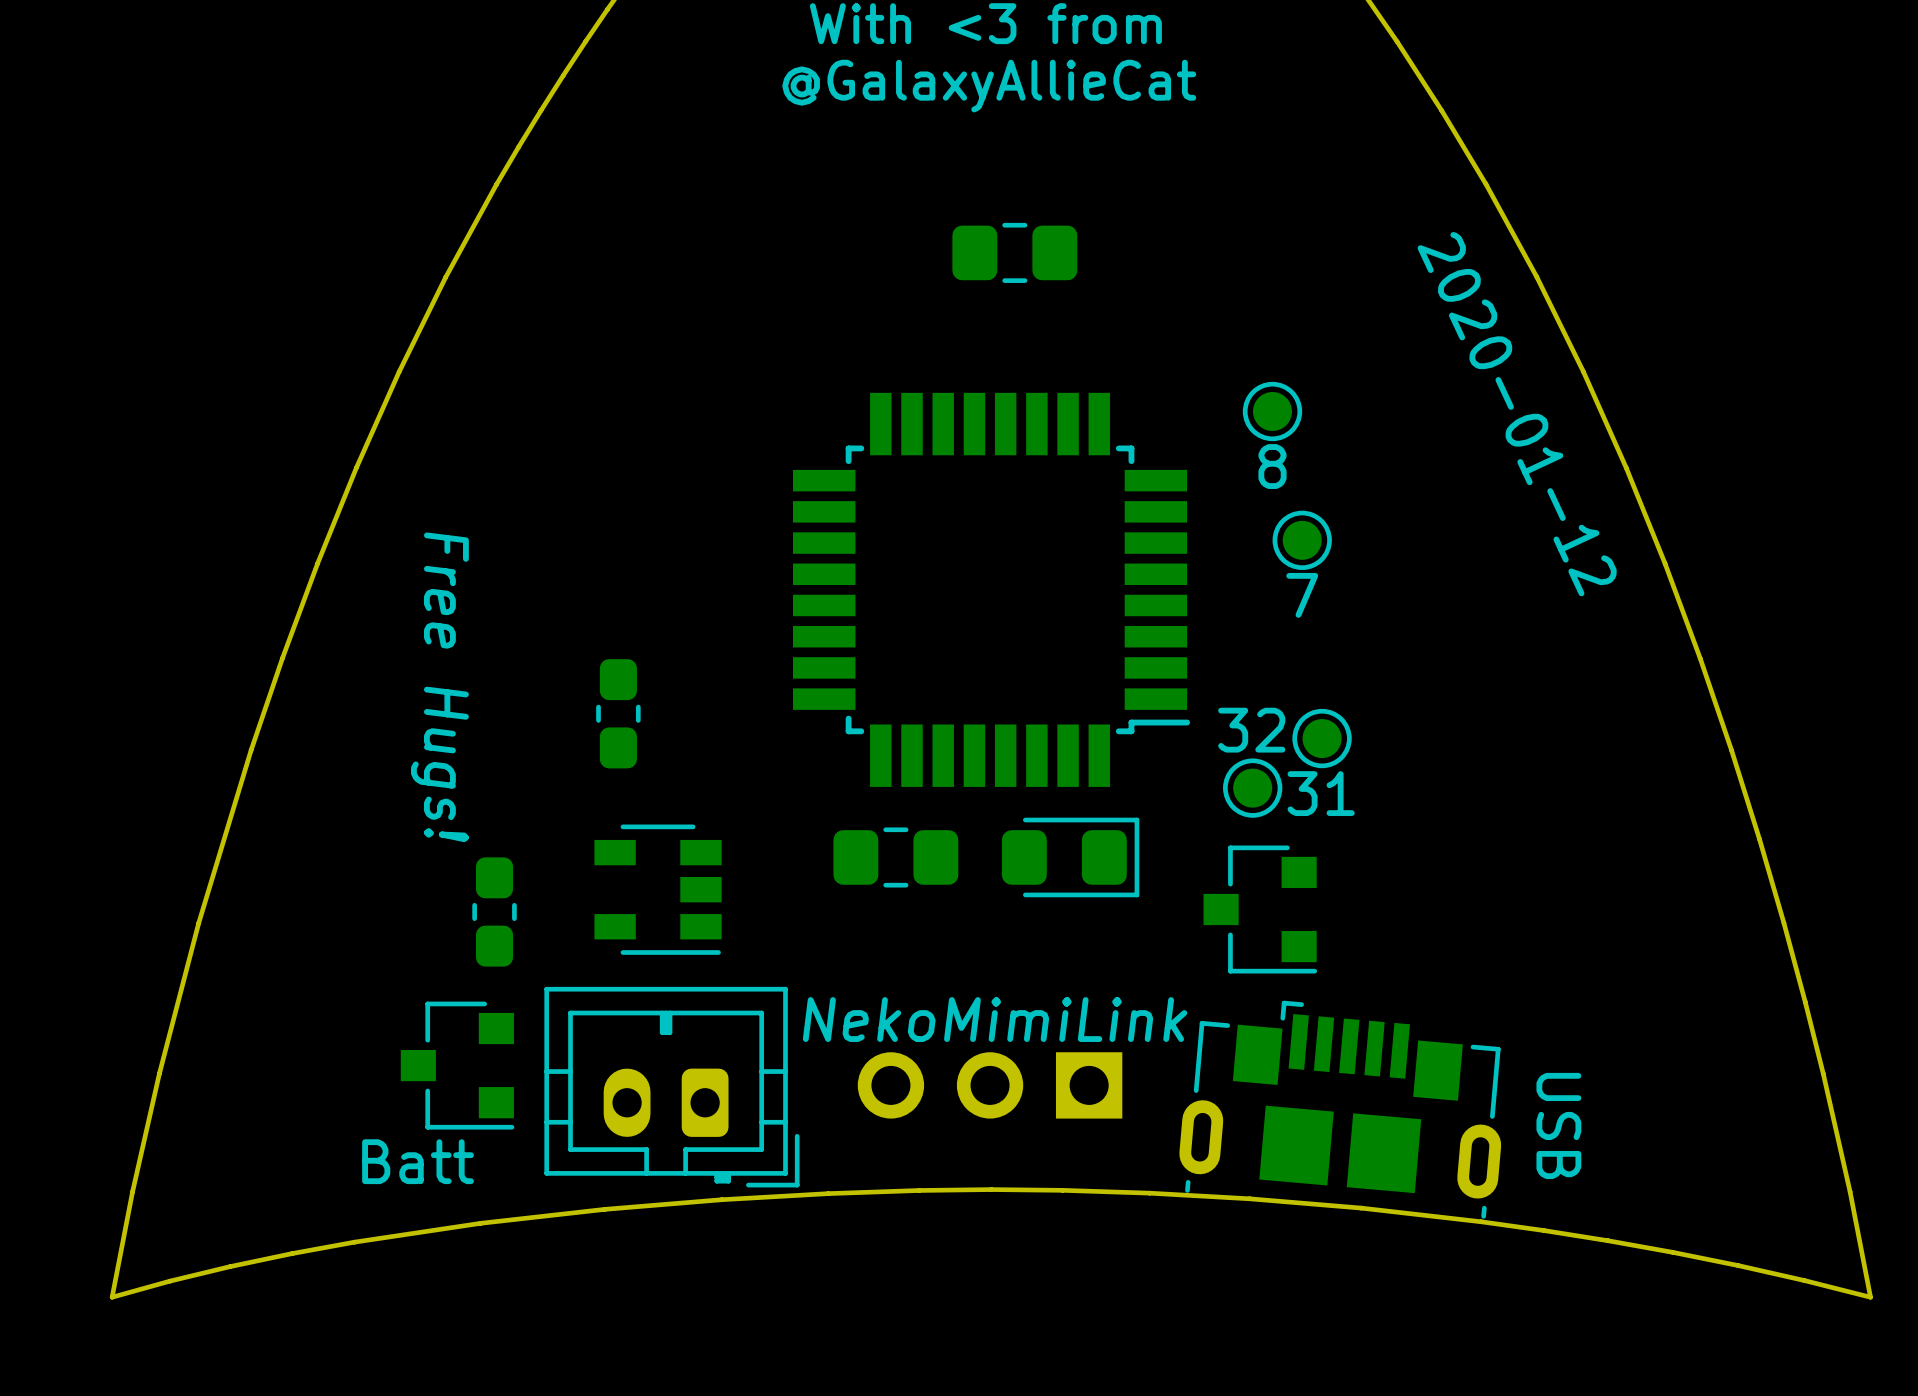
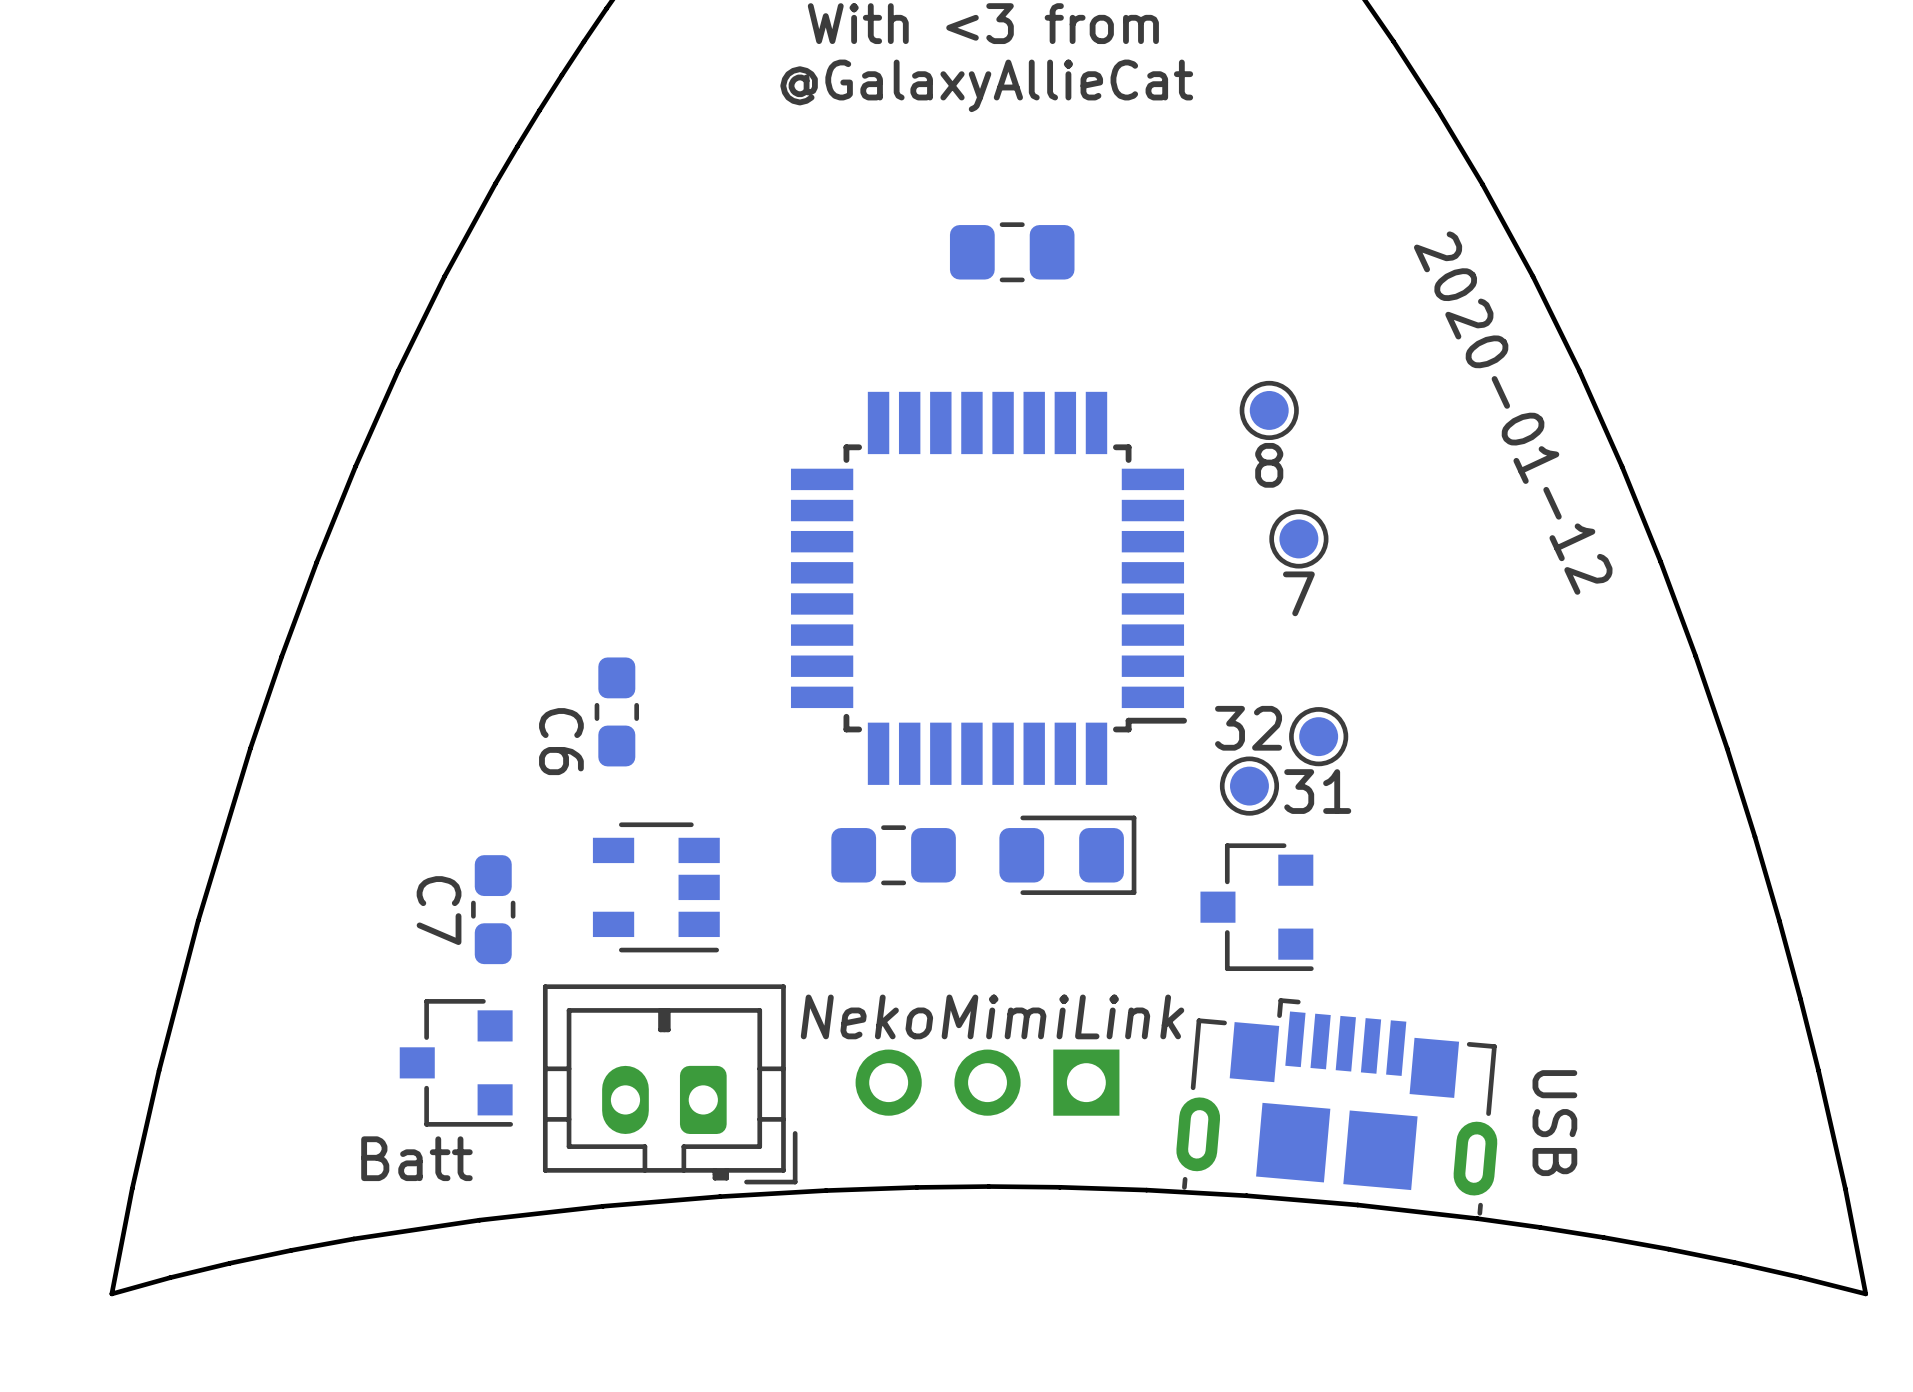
text: Free Hugs! (439, 687) -> none
C6 name: none -> C6 (561, 741)
C7 name: none -> C7 (439, 910)

